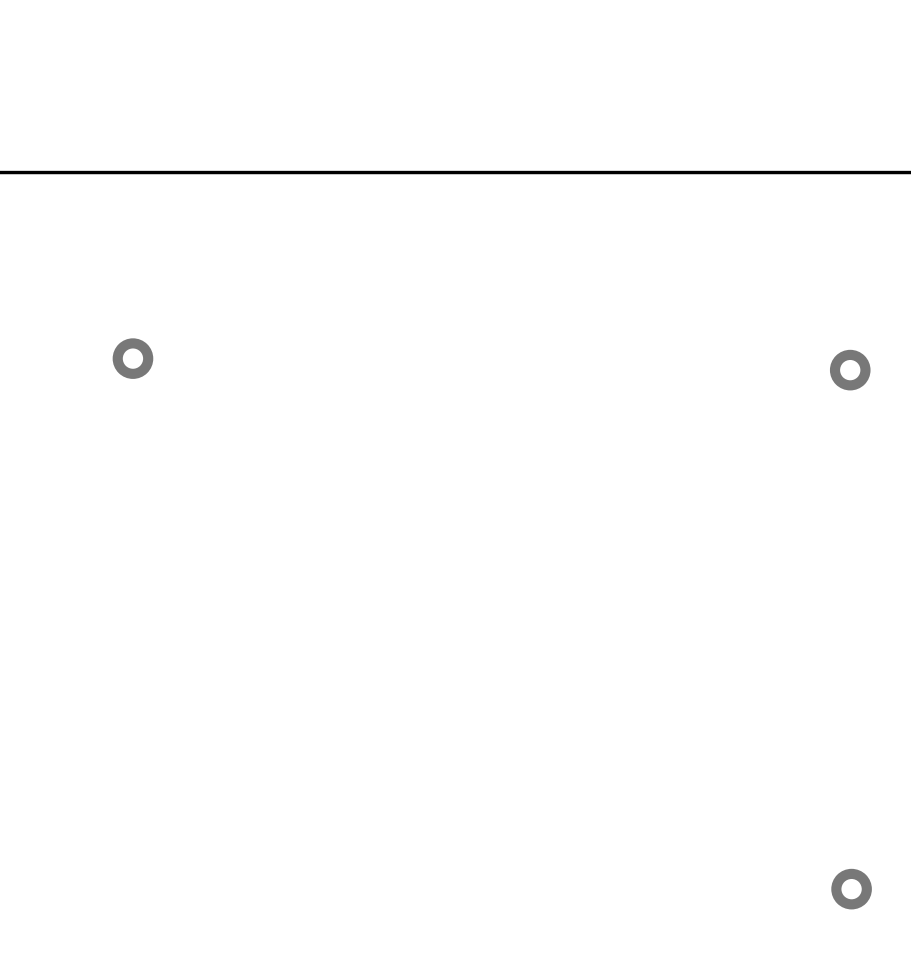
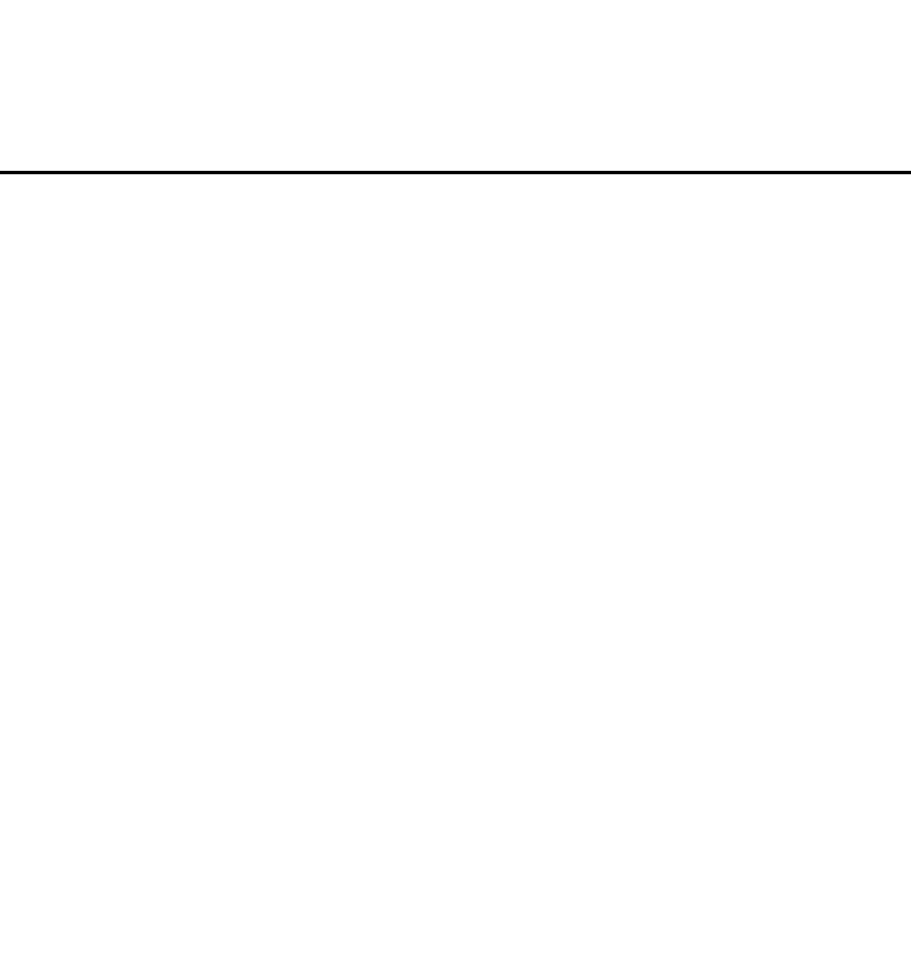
via: (132, 358) -> none
via: (850, 370) -> none
via: (851, 889) -> none

